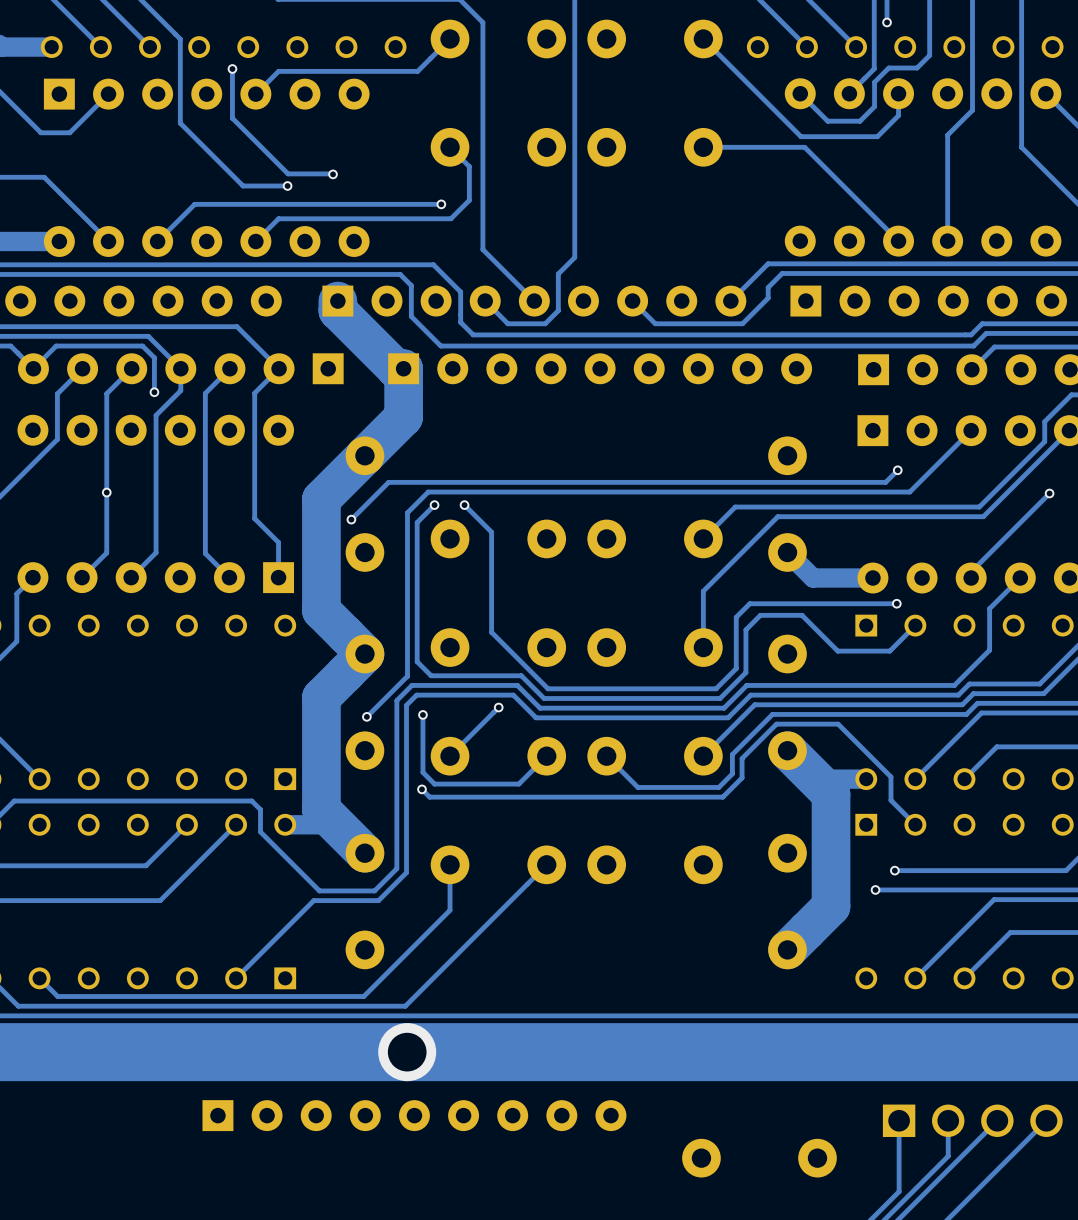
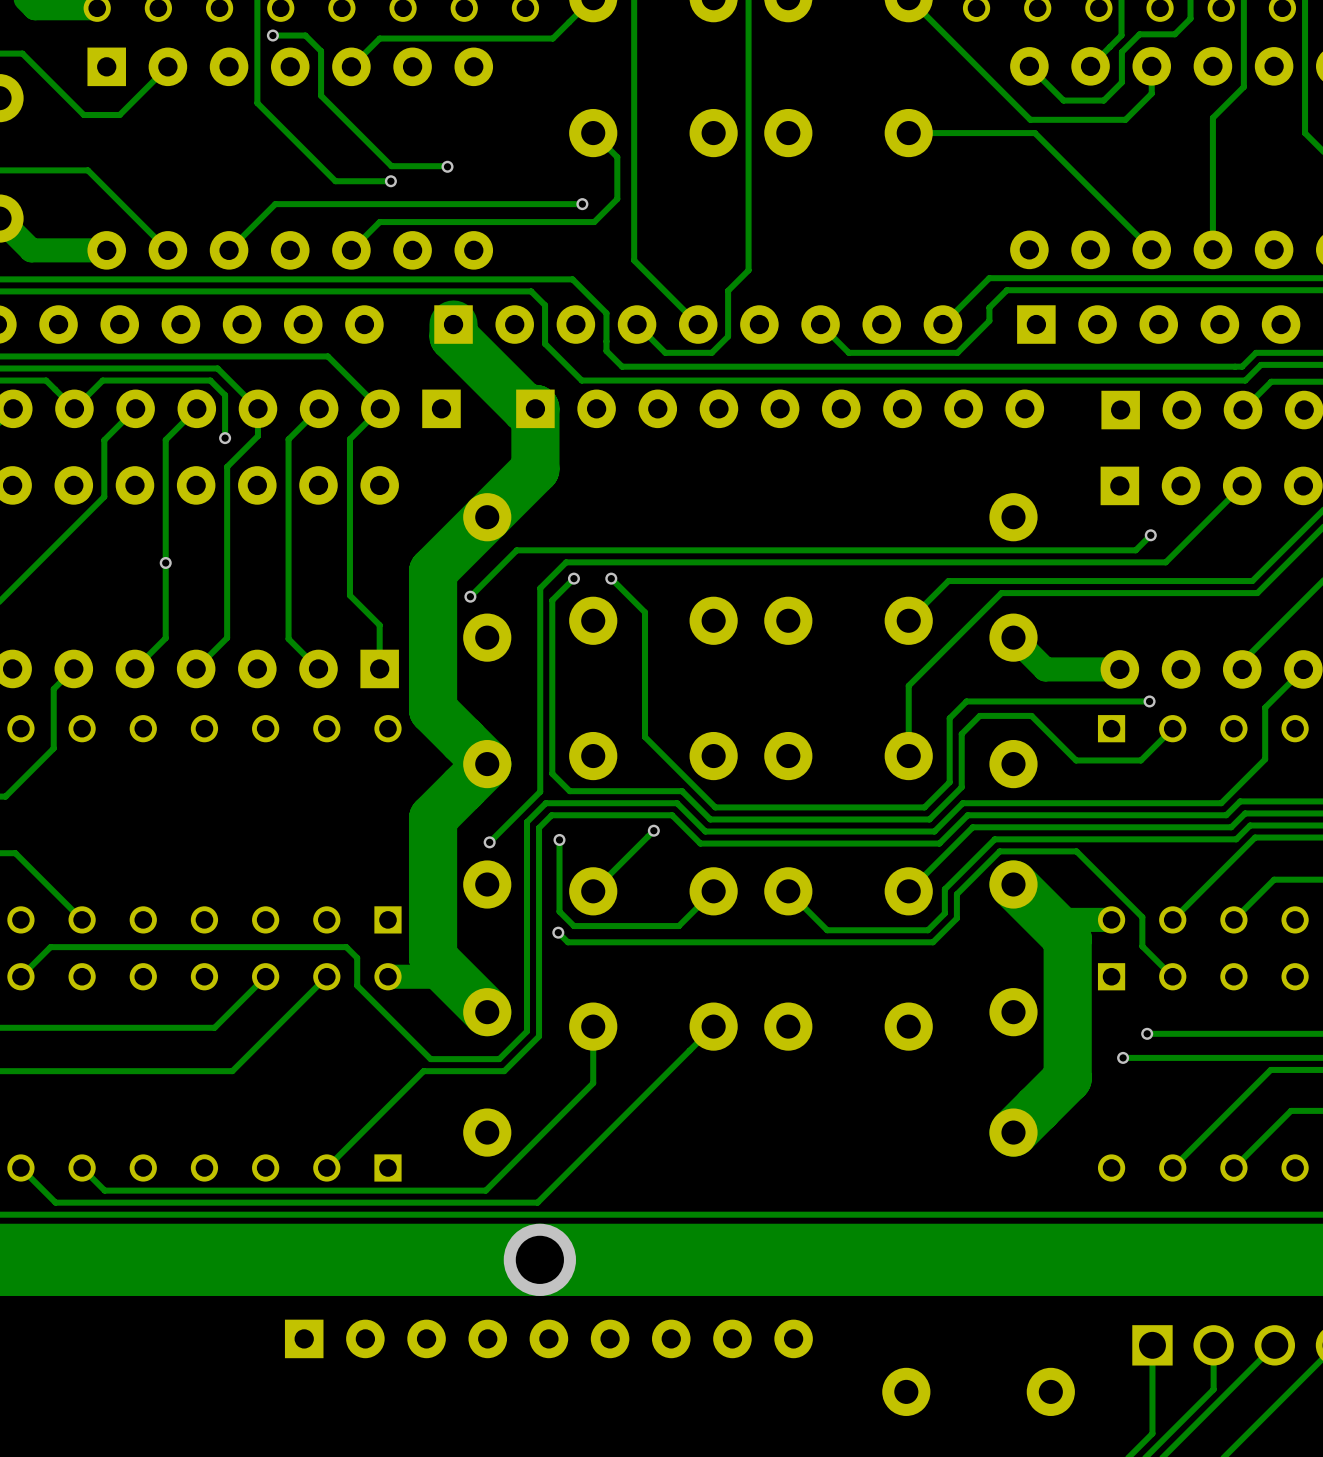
track: (232, 68) (232, 118) -> (272, 35) (305, 35) (321, 51) (322, 96)
via position: (232, 68) -> (272, 35)

